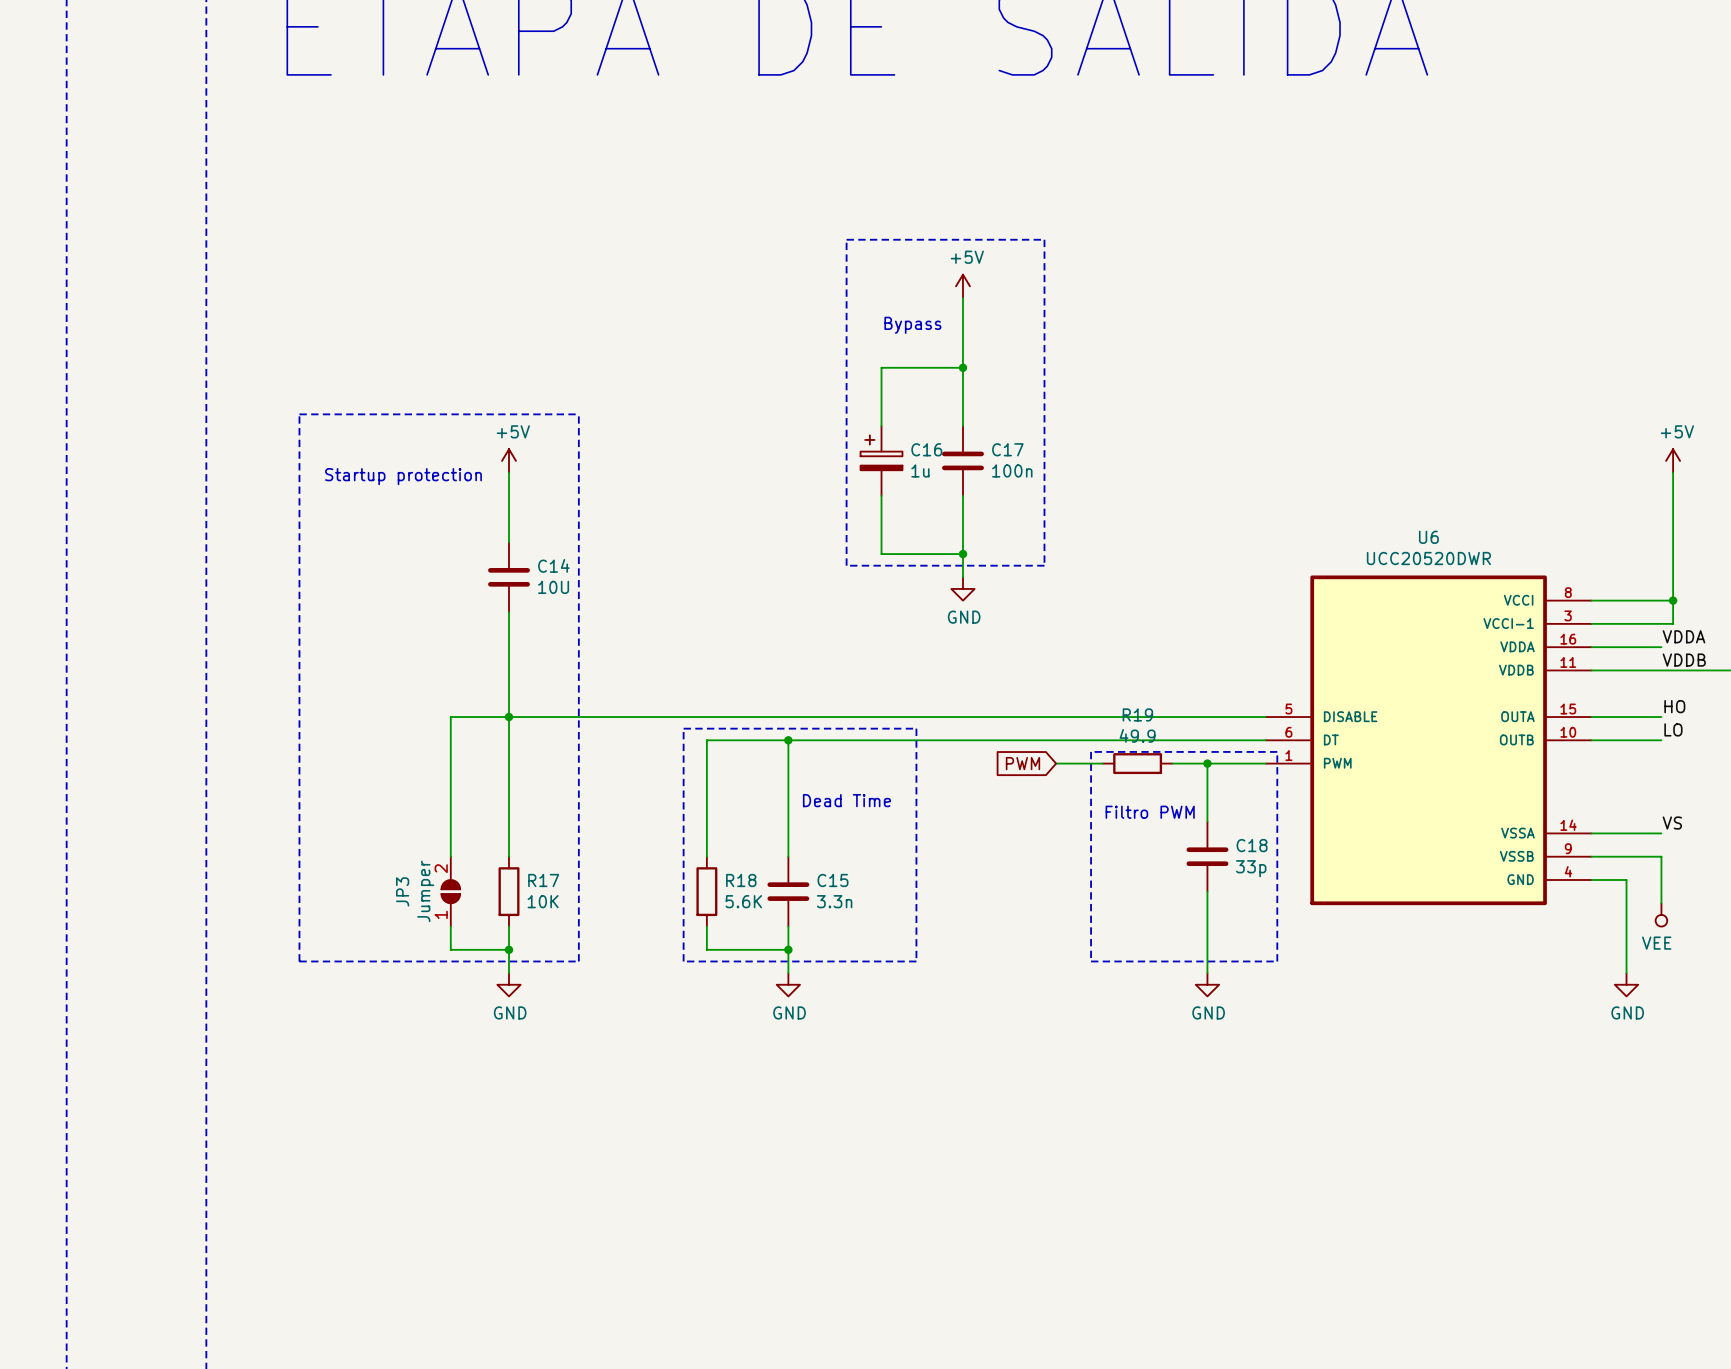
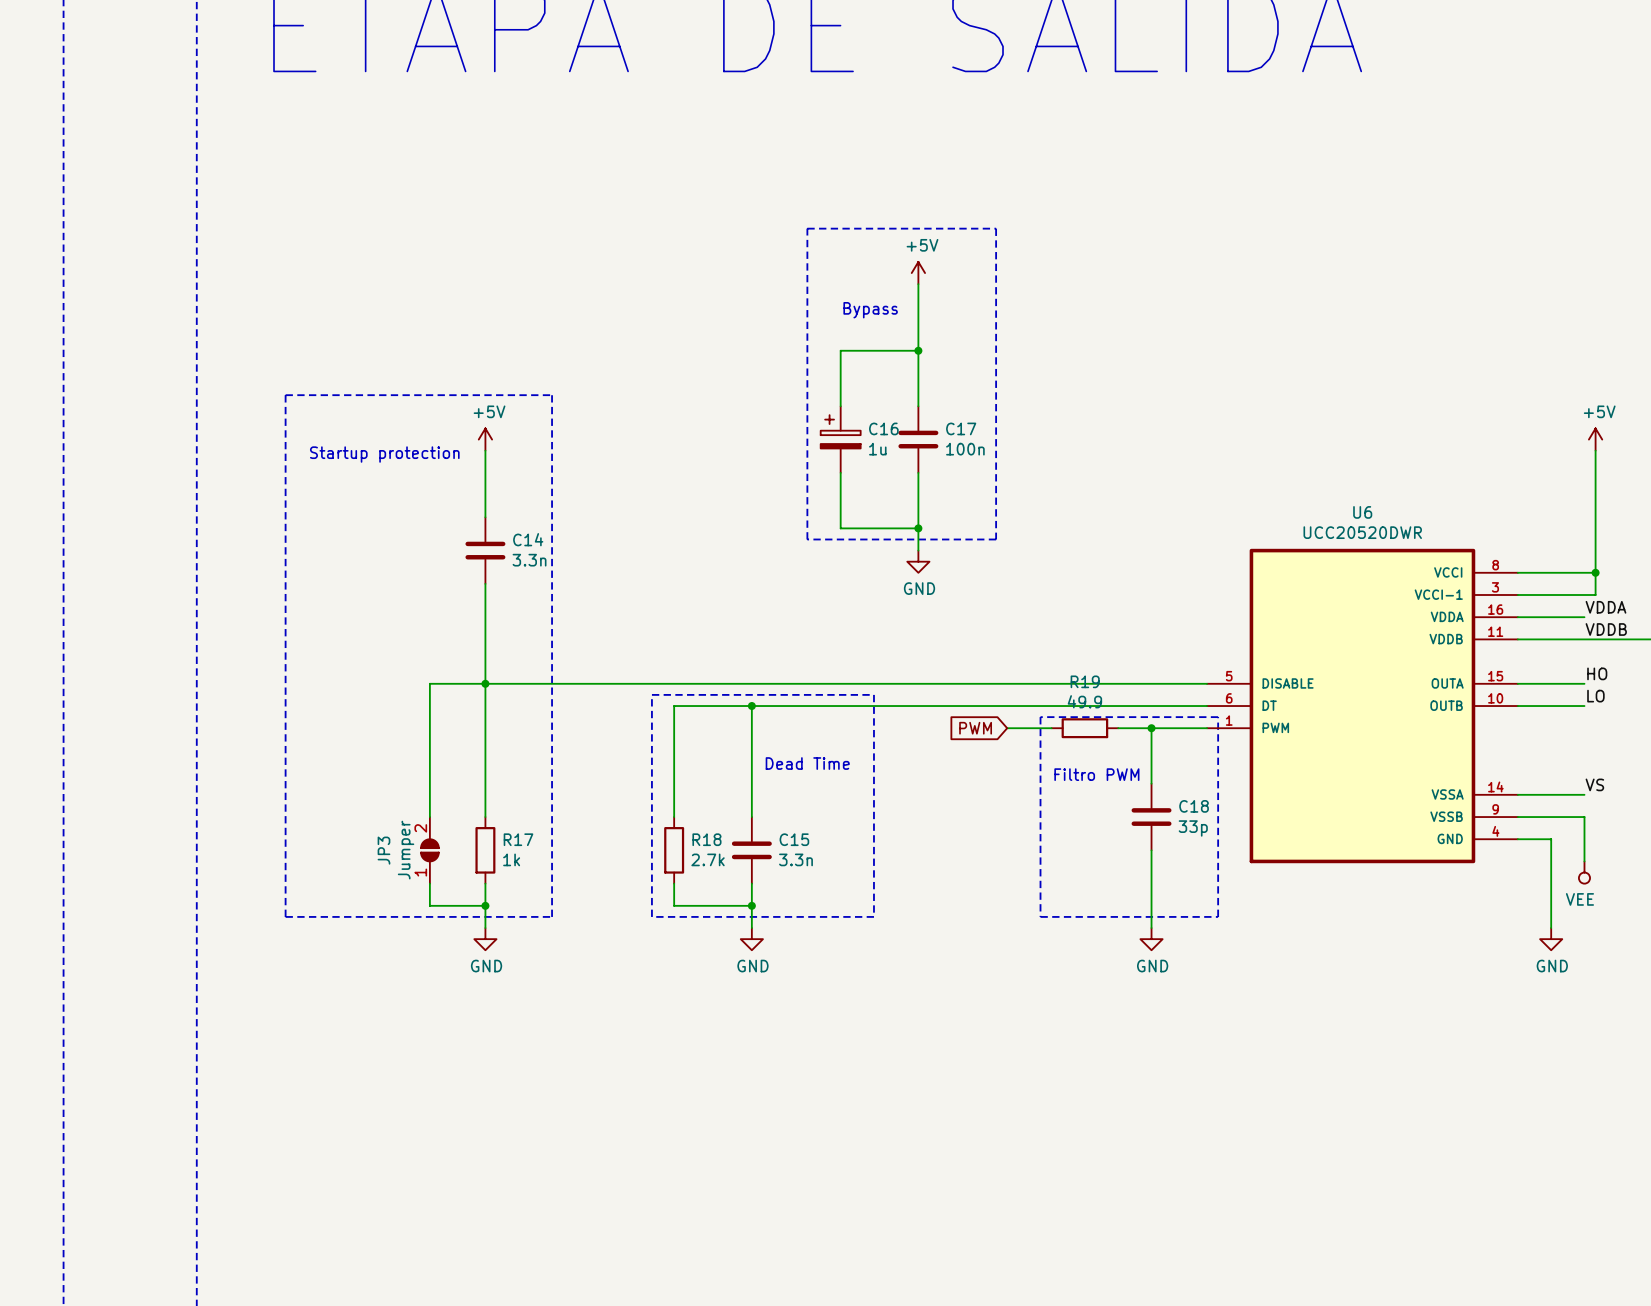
C14 value: 10U (553, 587) -> 3.3n (529, 560)
R17 value: 10K (543, 901) -> 1k (511, 859)
R18 value: 5.6K (743, 901) -> 2.7k (708, 859)

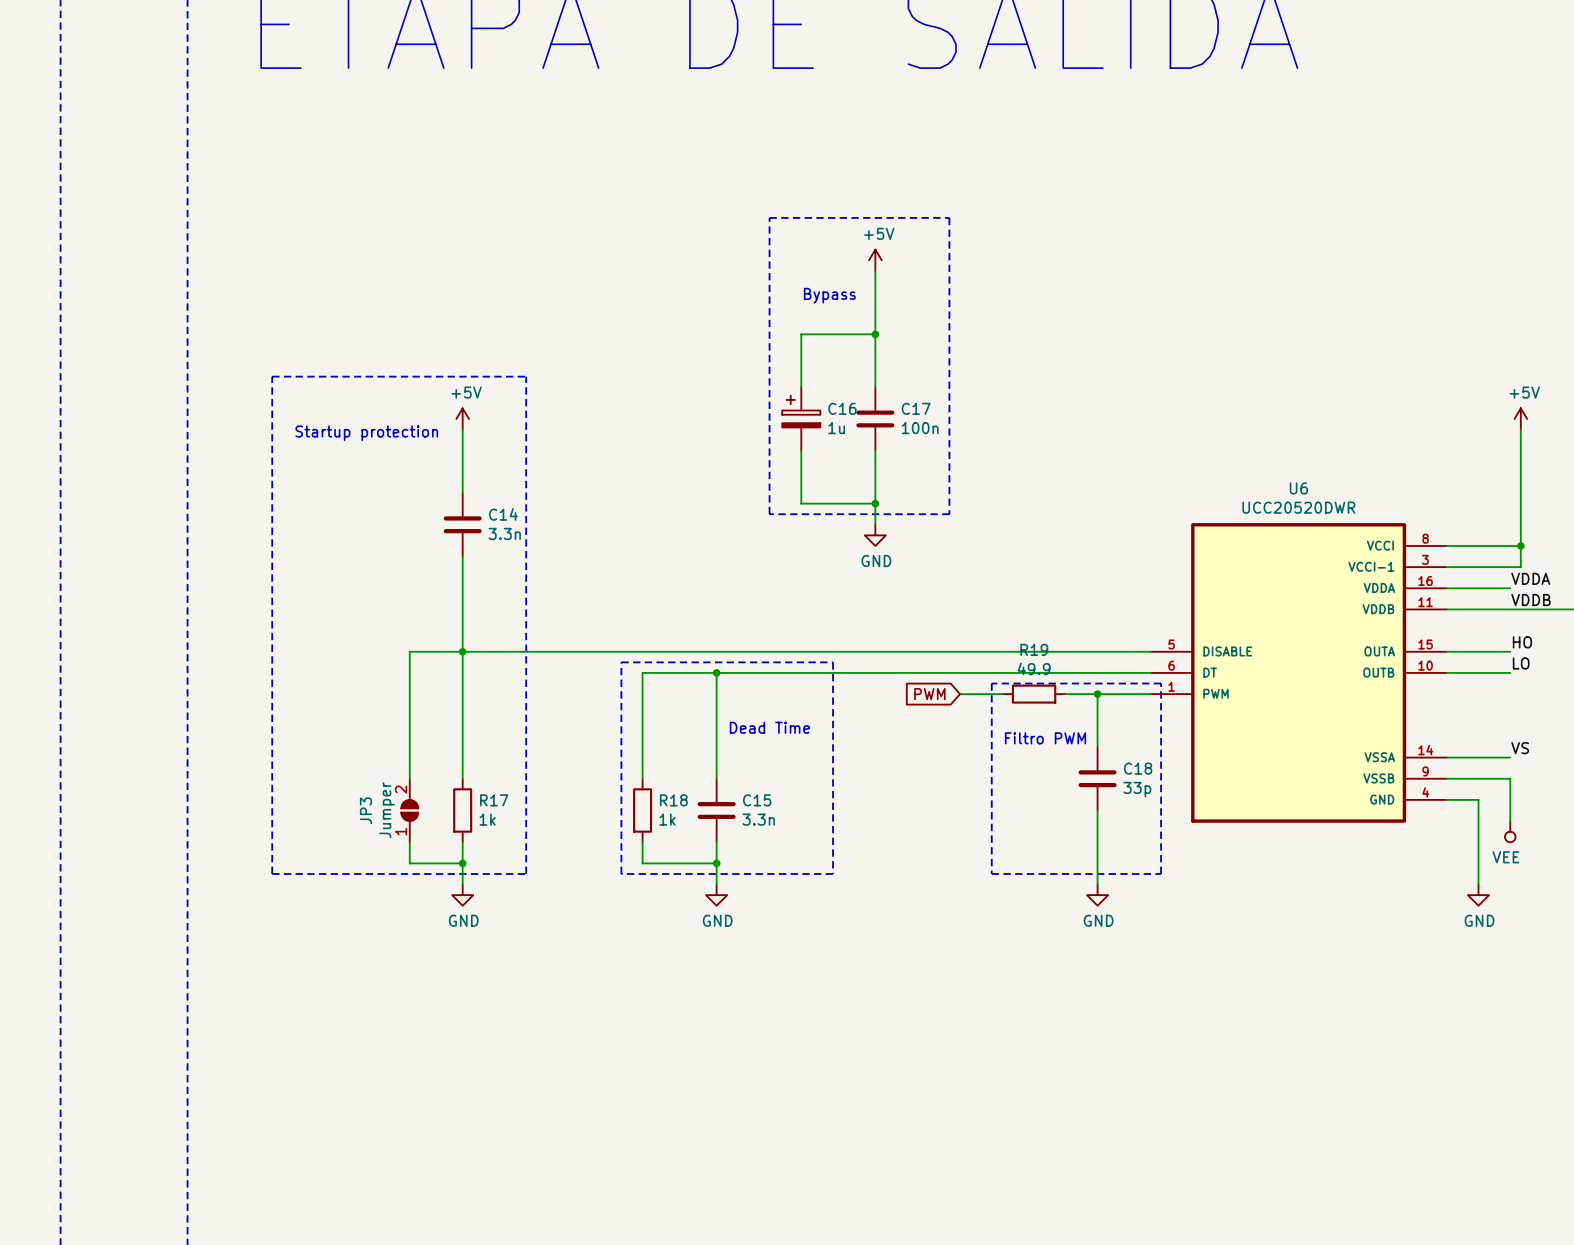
R18 value: 2.7k (708, 859) -> 1k (667, 819)

